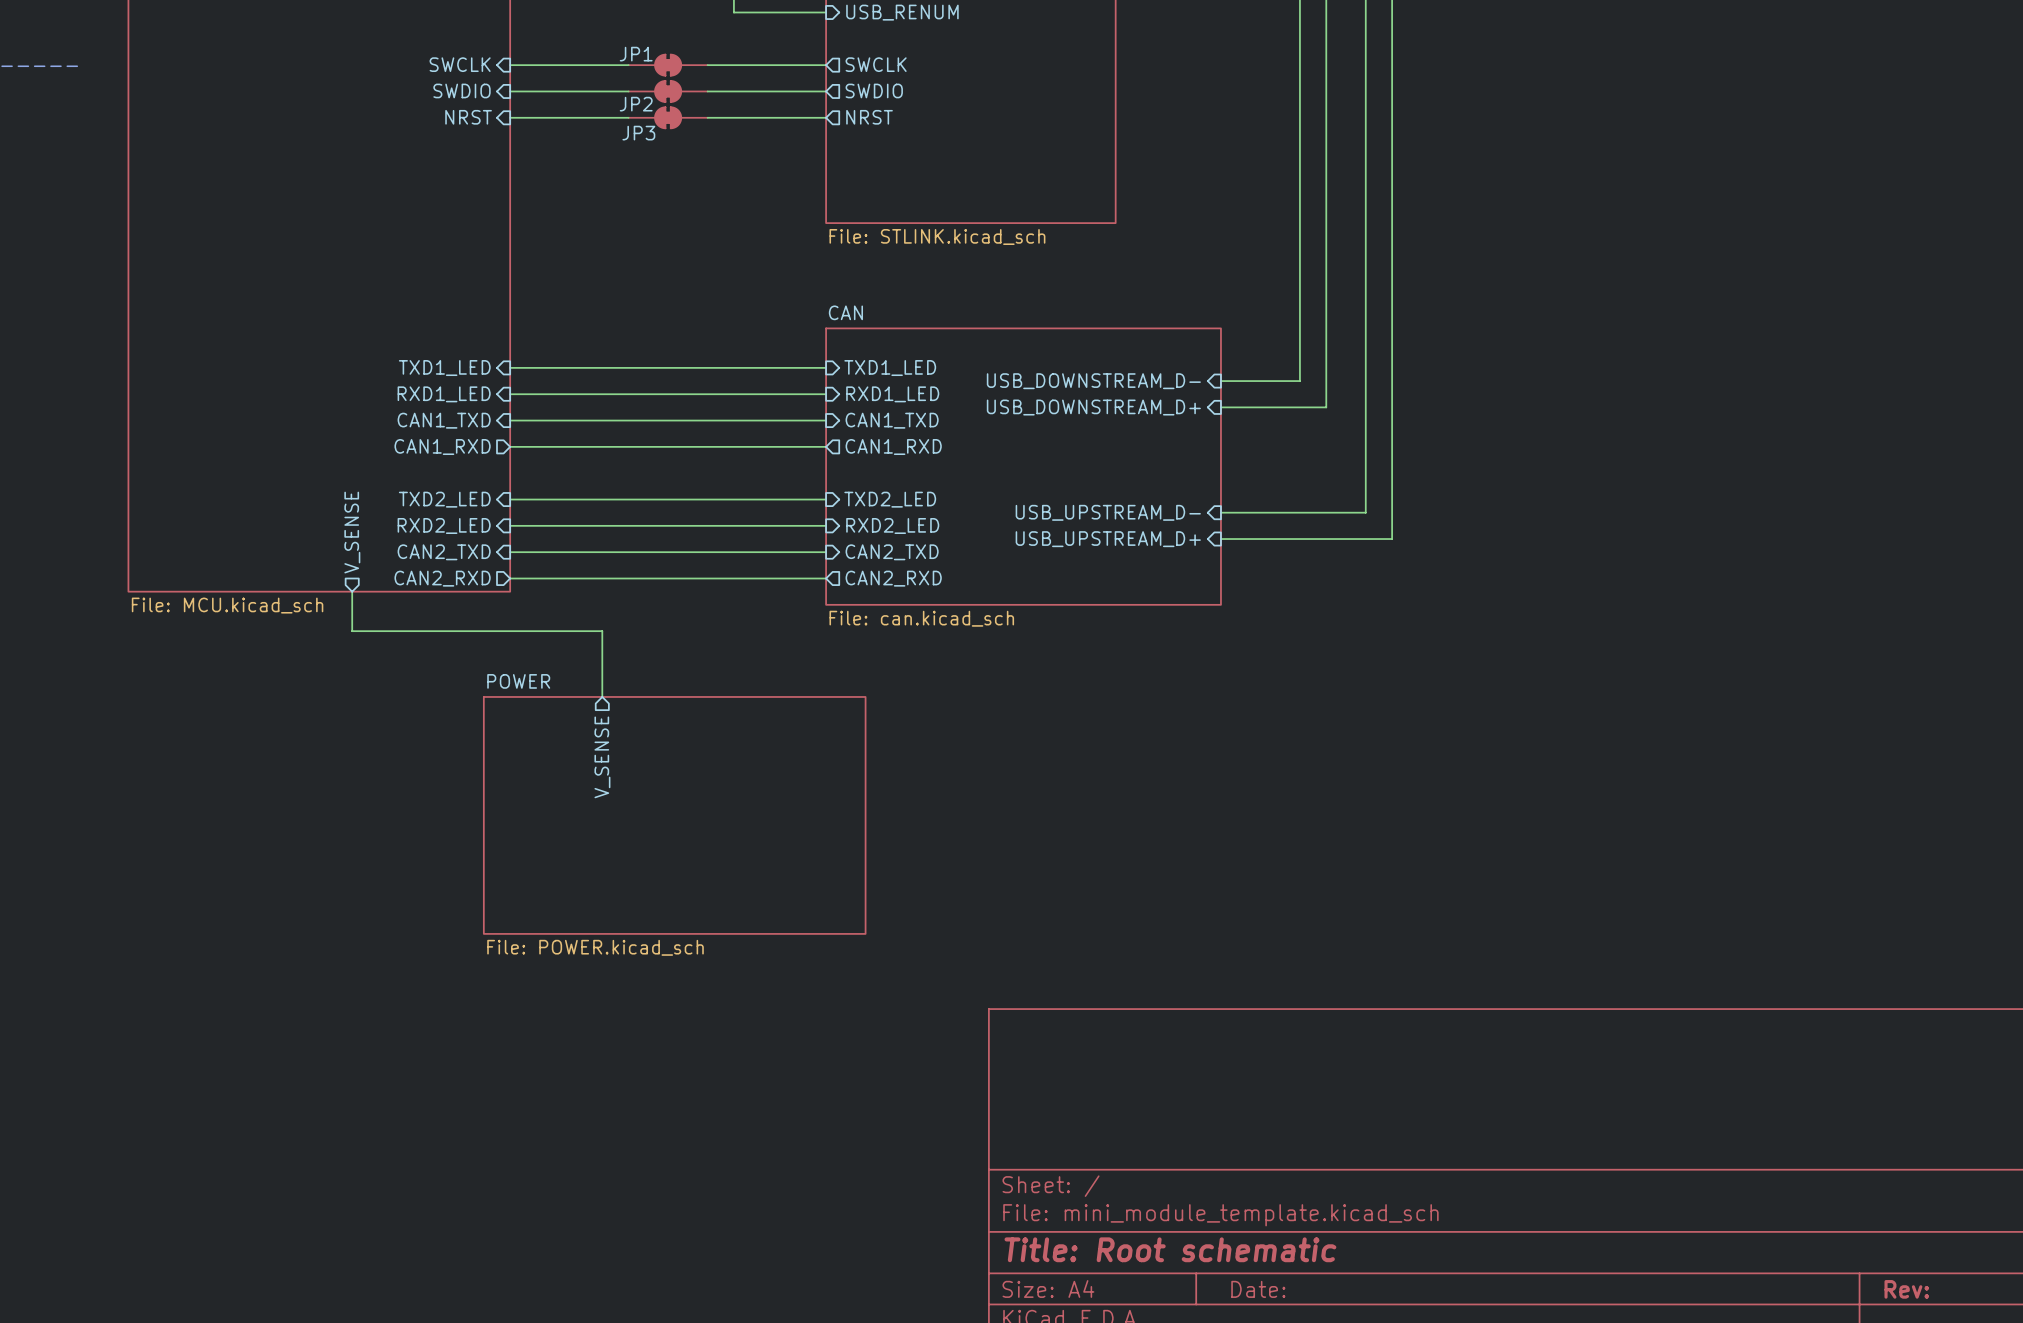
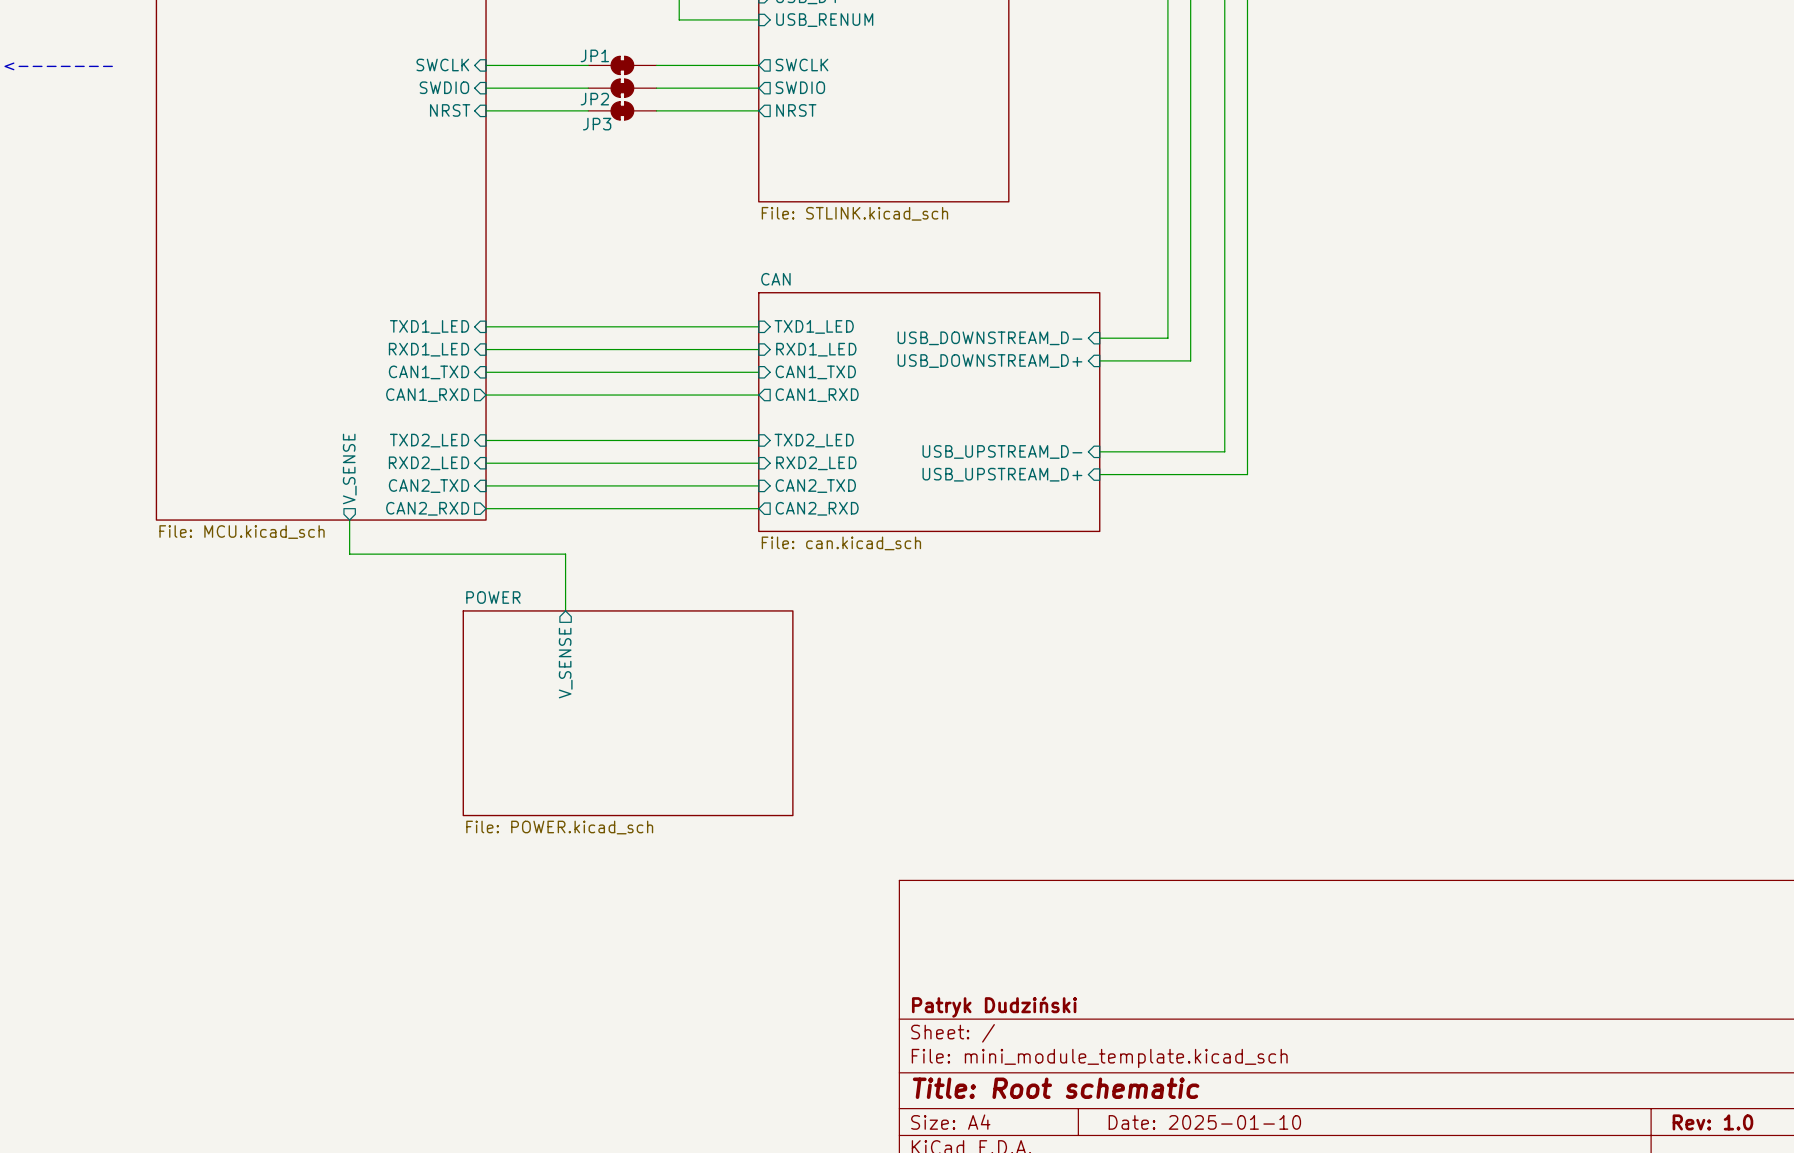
title block: none -> Patryk Dudziński (994, 1007)
title block: Date: (1258, 1289) -> Date: 2025-01-10 (1204, 1122)
title block: Rev: (1906, 1289) -> Rev: 1.0 (1712, 1122)

